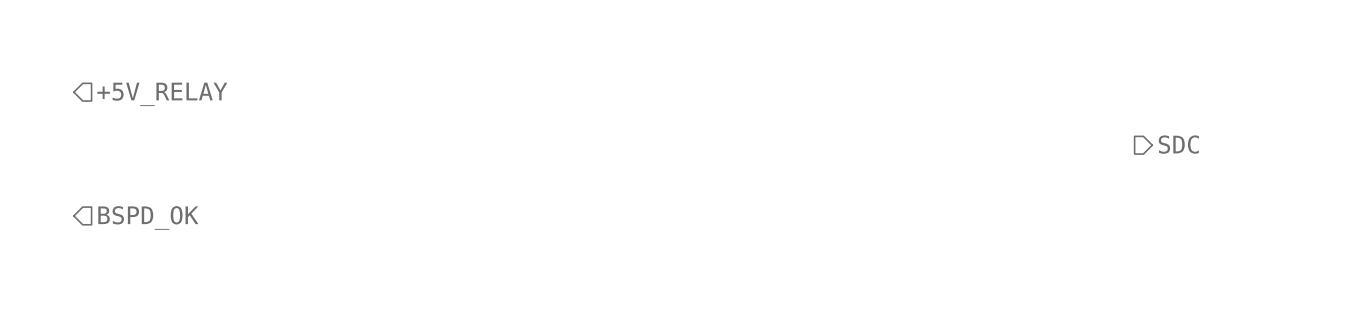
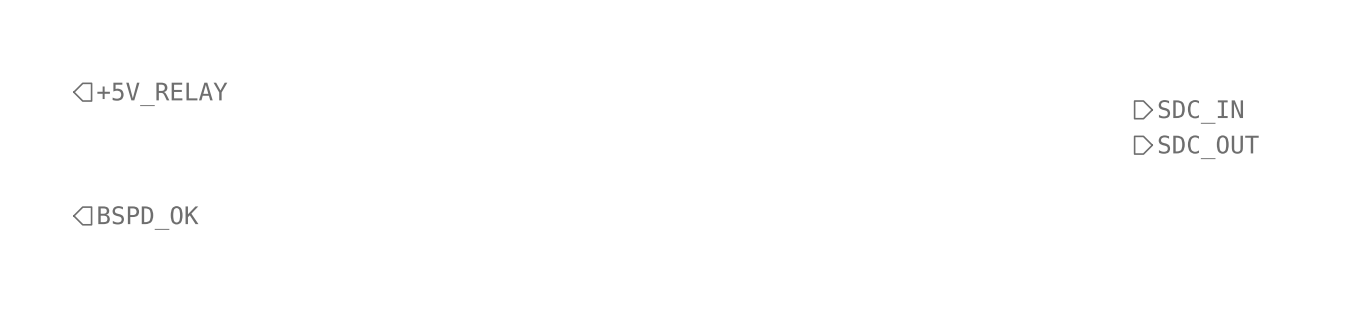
hierarchical label: none -> SDC_IN (1200, 111)
hierarchical label: SDC (1178, 144) -> SDC_OUT (1208, 147)

